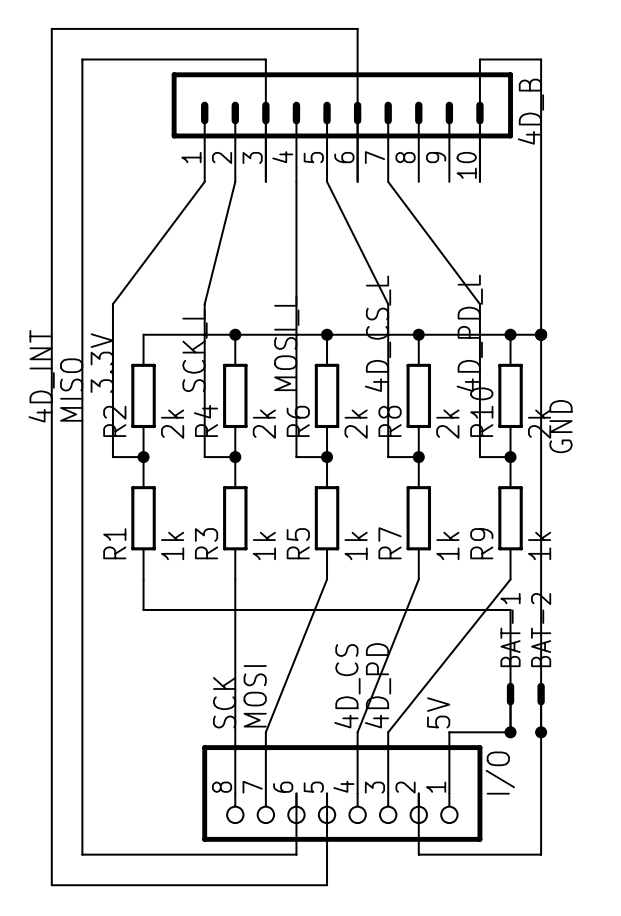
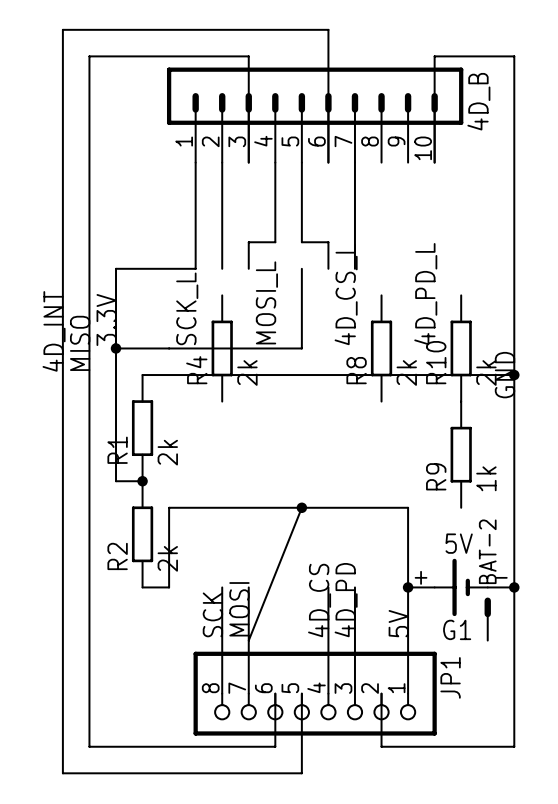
wire: (541, 59) (541, 854) -> (487, 56) (514, 56) (514, 746) (487, 746)
wire: (204, 181) (112, 304) -> (195, 162) (195, 268) (116, 268)
wire: (235, 181) (204, 304) (204, 457) (235, 457) -> (222, 162) (222, 268)
wire: (327, 181) (388, 304) (388, 457) (418, 457) -> (301, 162) (301, 242) (328, 242) (328, 268)
wire: (388, 181) (479, 304) (479, 457) (510, 457) -> (354, 162) (354, 268)
wire: (296, 273) (296, 457) (327, 457) -> (275, 242) (248, 242) (248, 268)
wire: none -> (301, 268) (301, 348) (116, 348)
wire: (143, 334) (541, 334) -> none
junction: (235, 334) -> none
junction: (327, 334) -> none
junction: (418, 334) -> none
junction: (510, 334) -> none
junction: (541, 334) -> none
junction: none -> (116, 348)
R2 position: (143, 395) -> (142, 534)
R6: 2k (327, 395) -> none
wire: none -> (142, 375) (514, 375)
junction: none -> (514, 375)
wire: (112, 457) (143, 457) -> (116, 401) (116, 481) (142, 481)
junction: (143, 457) -> none
junction: (235, 457) -> none
junction: (327, 457) -> none
junction: (418, 457) -> none
junction: (510, 457) -> none
R1 position: (143, 518) -> (142, 428)
R3: 1k (235, 518) -> none
R5: 1k (327, 518) -> none
R7: 1k (418, 518) -> none
R1 value: 1k (172, 546) -> 2k (167, 452)
junction: none -> (142, 481)
wire: (143, 579) (143, 609) (510, 609) (510, 732) (449, 732) -> (142, 587) (169, 587) (169, 507) (408, 507) (408, 640)
wire: (235, 579) (235, 671) -> none
junction: none -> (301, 507)
wire: (418, 579) (357, 732) -> (328, 587) (328, 640)
wire: (510, 579) (388, 732) -> (354, 587) (354, 640)
wire: none -> (248, 587) (248, 640)
junction: none -> (408, 587)
G1: none -> 5V (461, 587)
junction: none -> (514, 587)
BAT-1: (510, 707) -> none
junction: (510, 732) -> none
junction: (541, 732) -> none
I/O name: I/O (500, 773) -> JP1 (450, 677)

